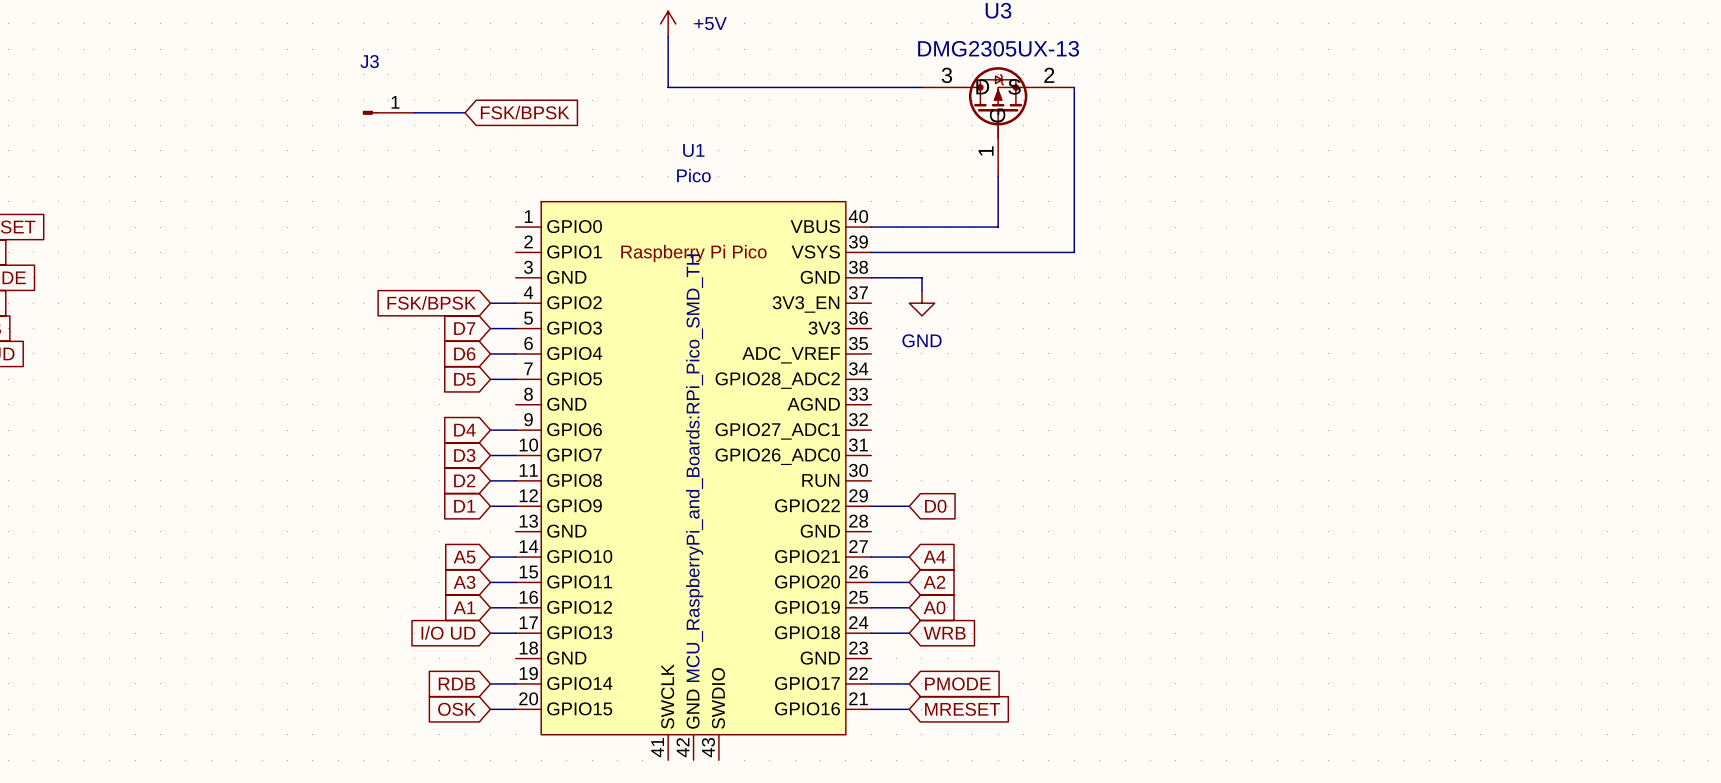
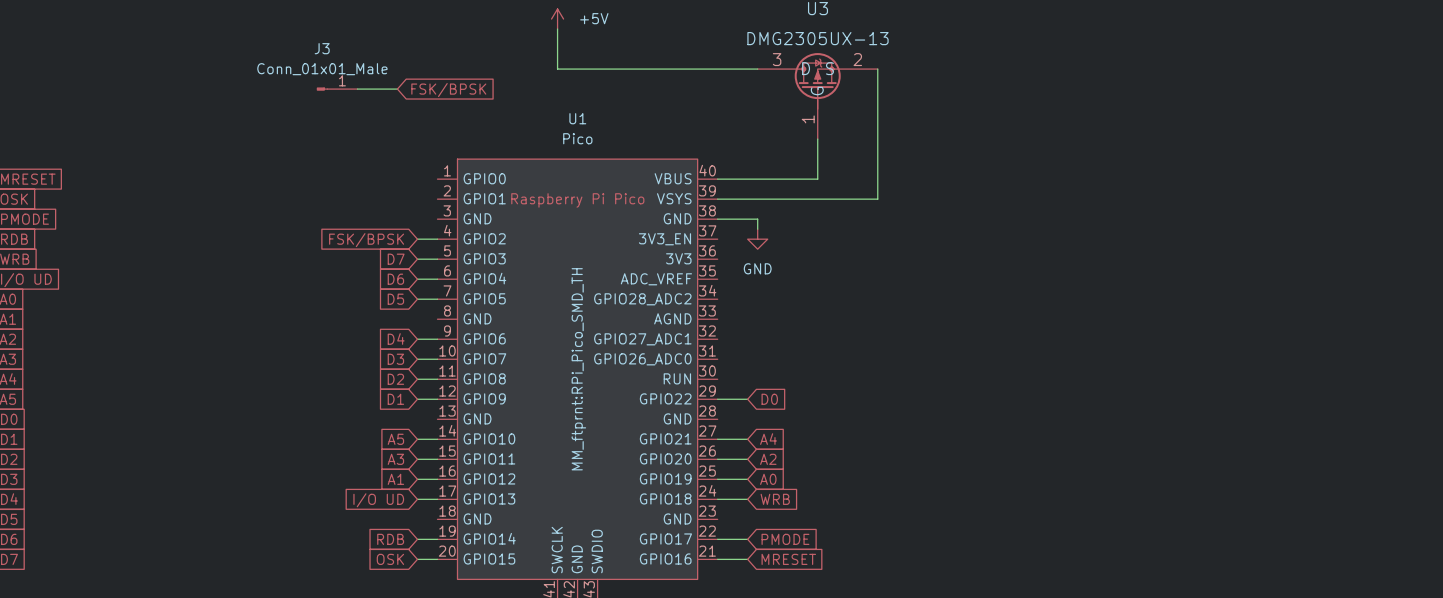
J3 value: none -> Conn_01x01_Male (322, 69)
U1 text: MCU_RaspberryPi_and_Boards:RPi_Pico_SMD_TH (694, 468) -> MM_ftprnt:RPi_Pico_SMD_TH (578, 369)

